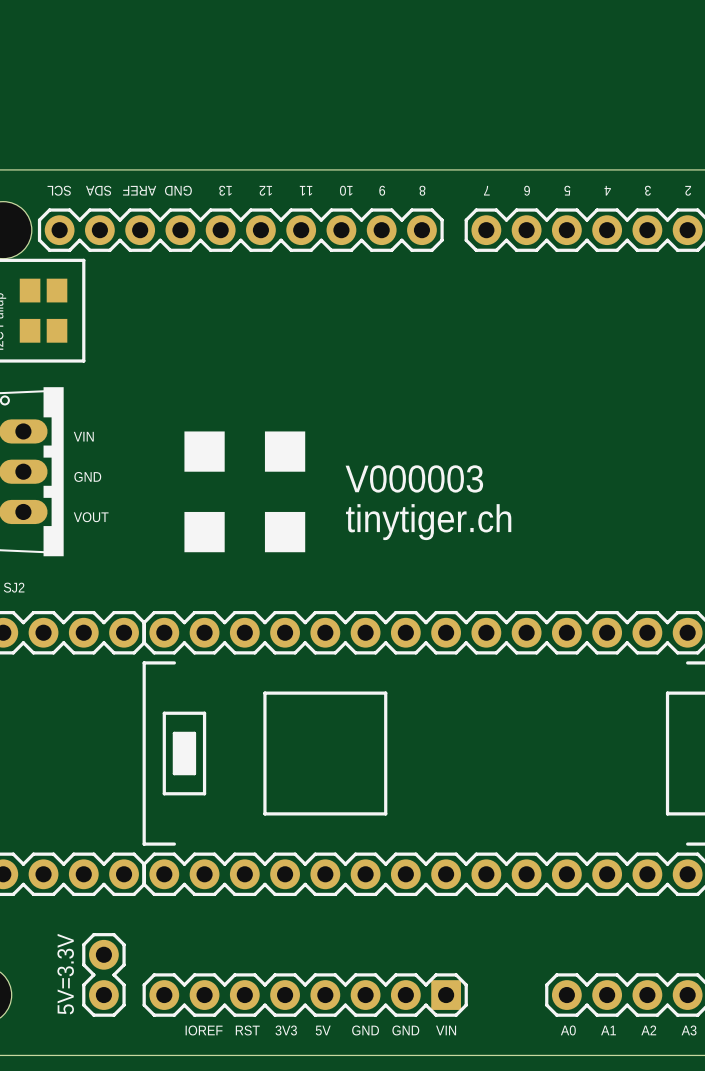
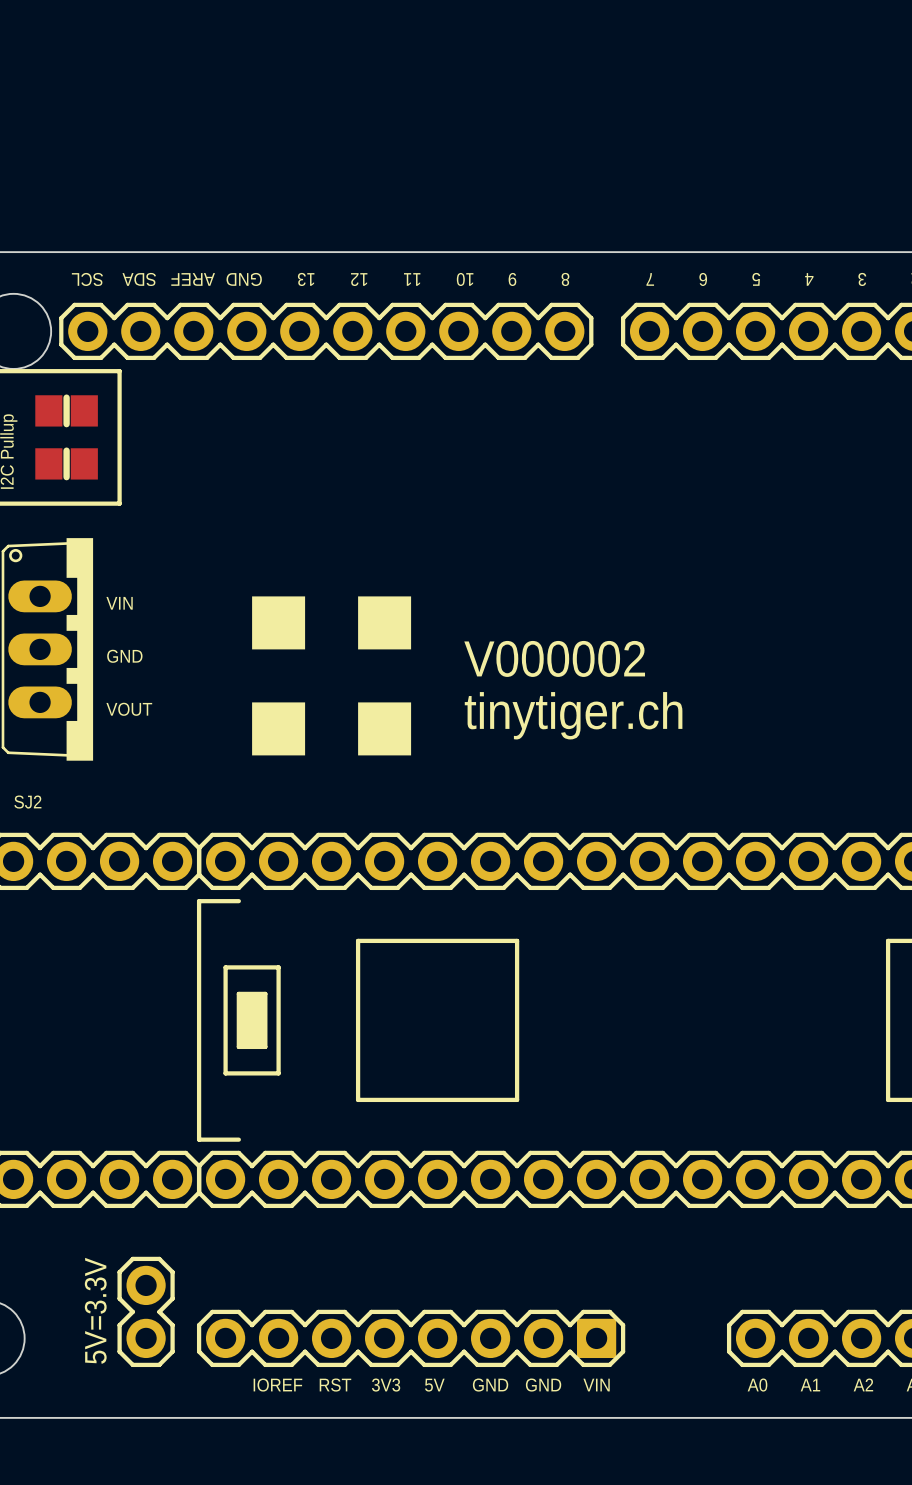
line: none -> (66, 397) (66, 424)
line: none -> (66, 450) (66, 477)
text: V000003 (414, 478) -> V000002 (554, 658)

